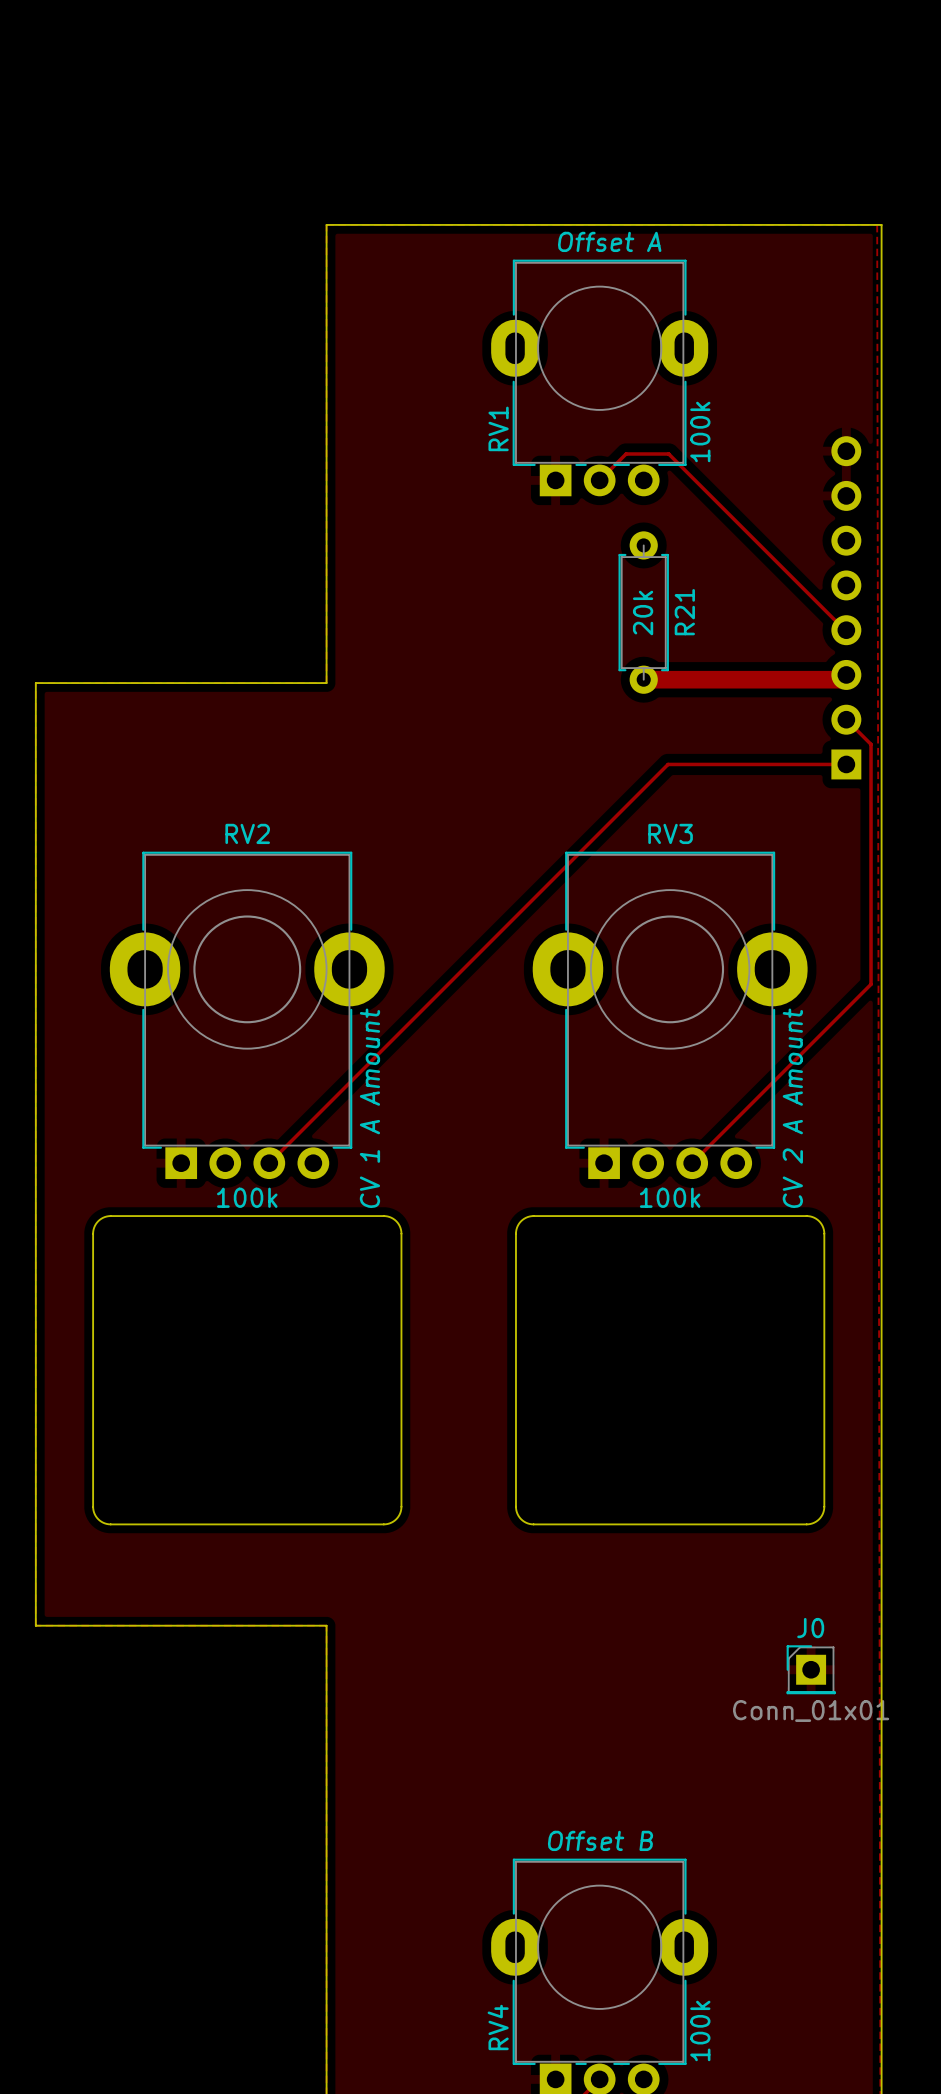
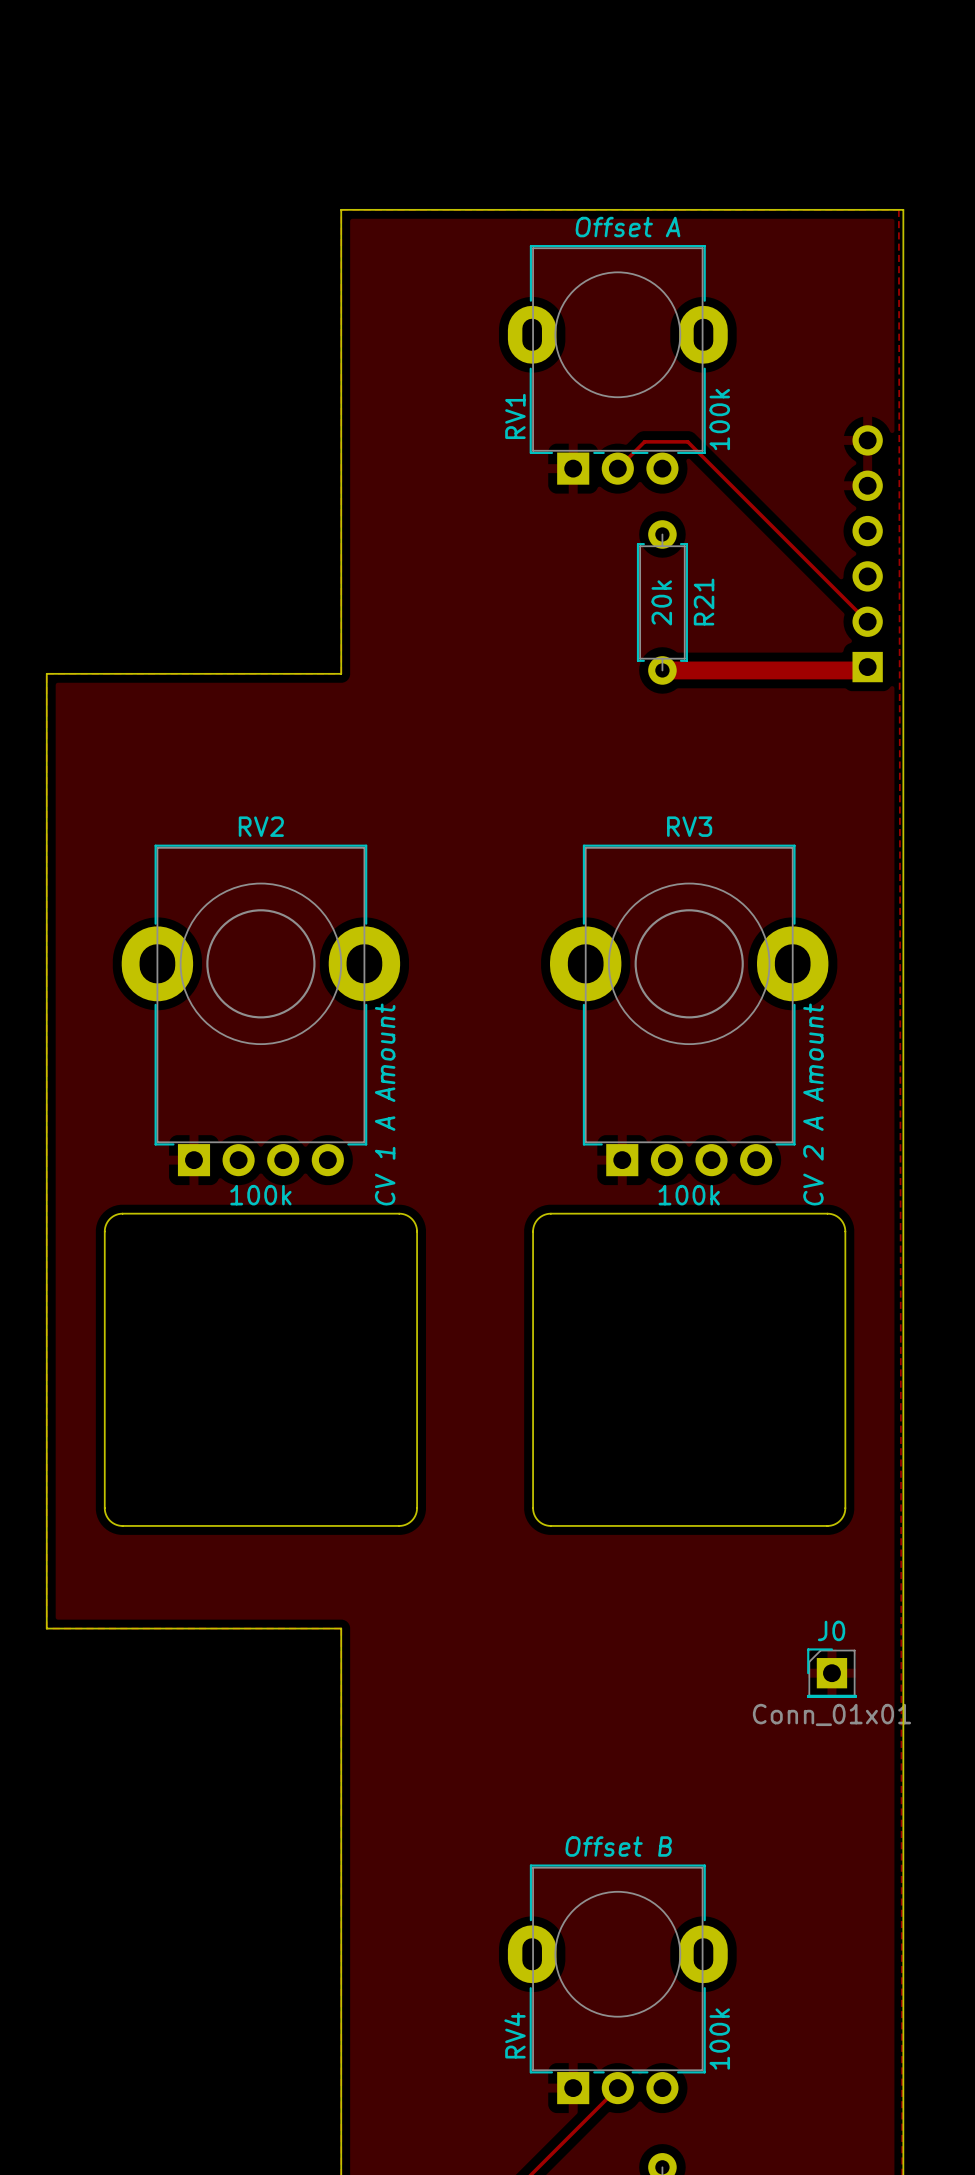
part: none -> (867, 553)
part: (846, 607) -> none
track: (846, 719) (871, 744) (871, 984) (692, 1163) -> none
track: (846, 764) (668, 764) (269, 1163) -> none

